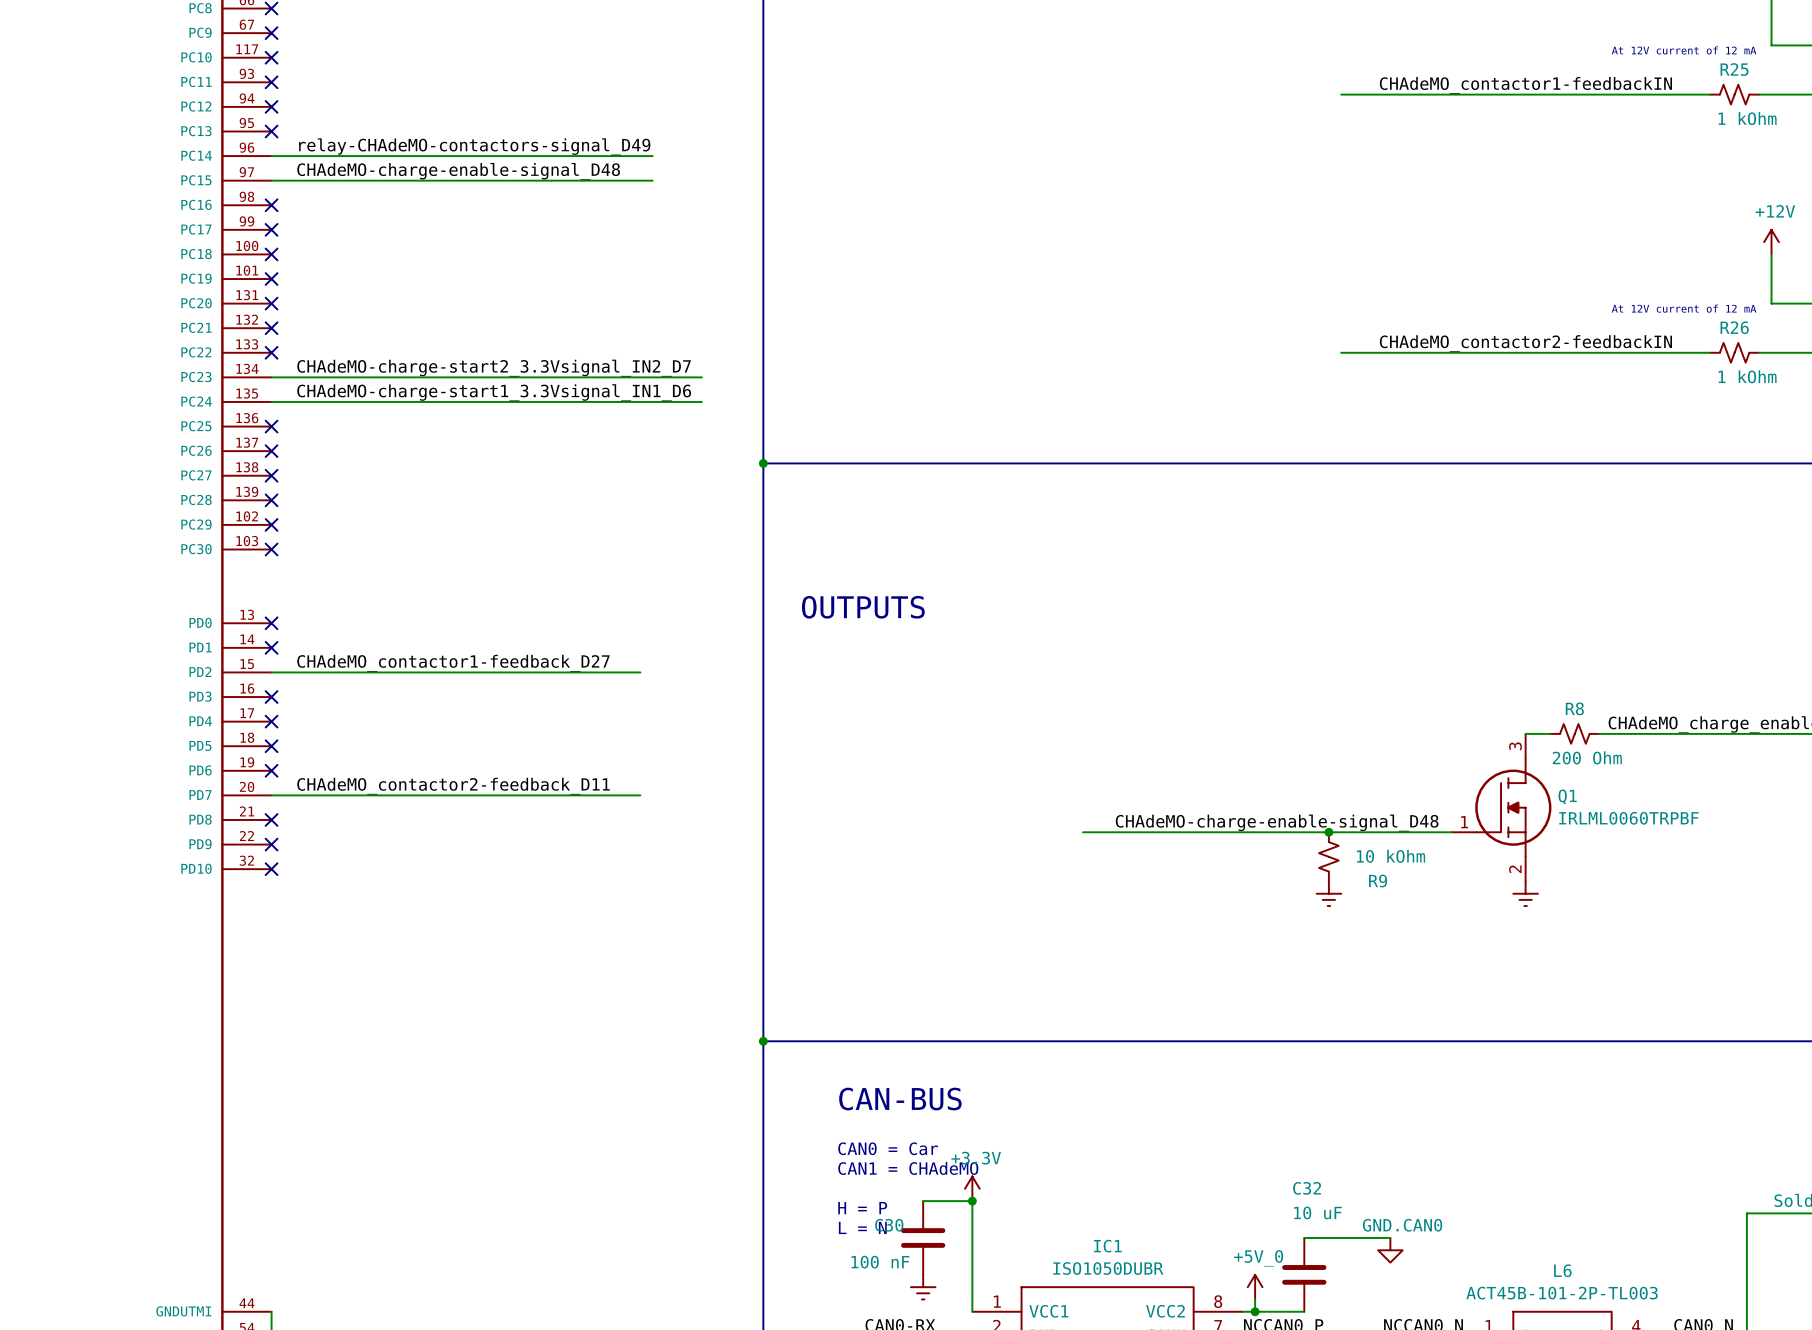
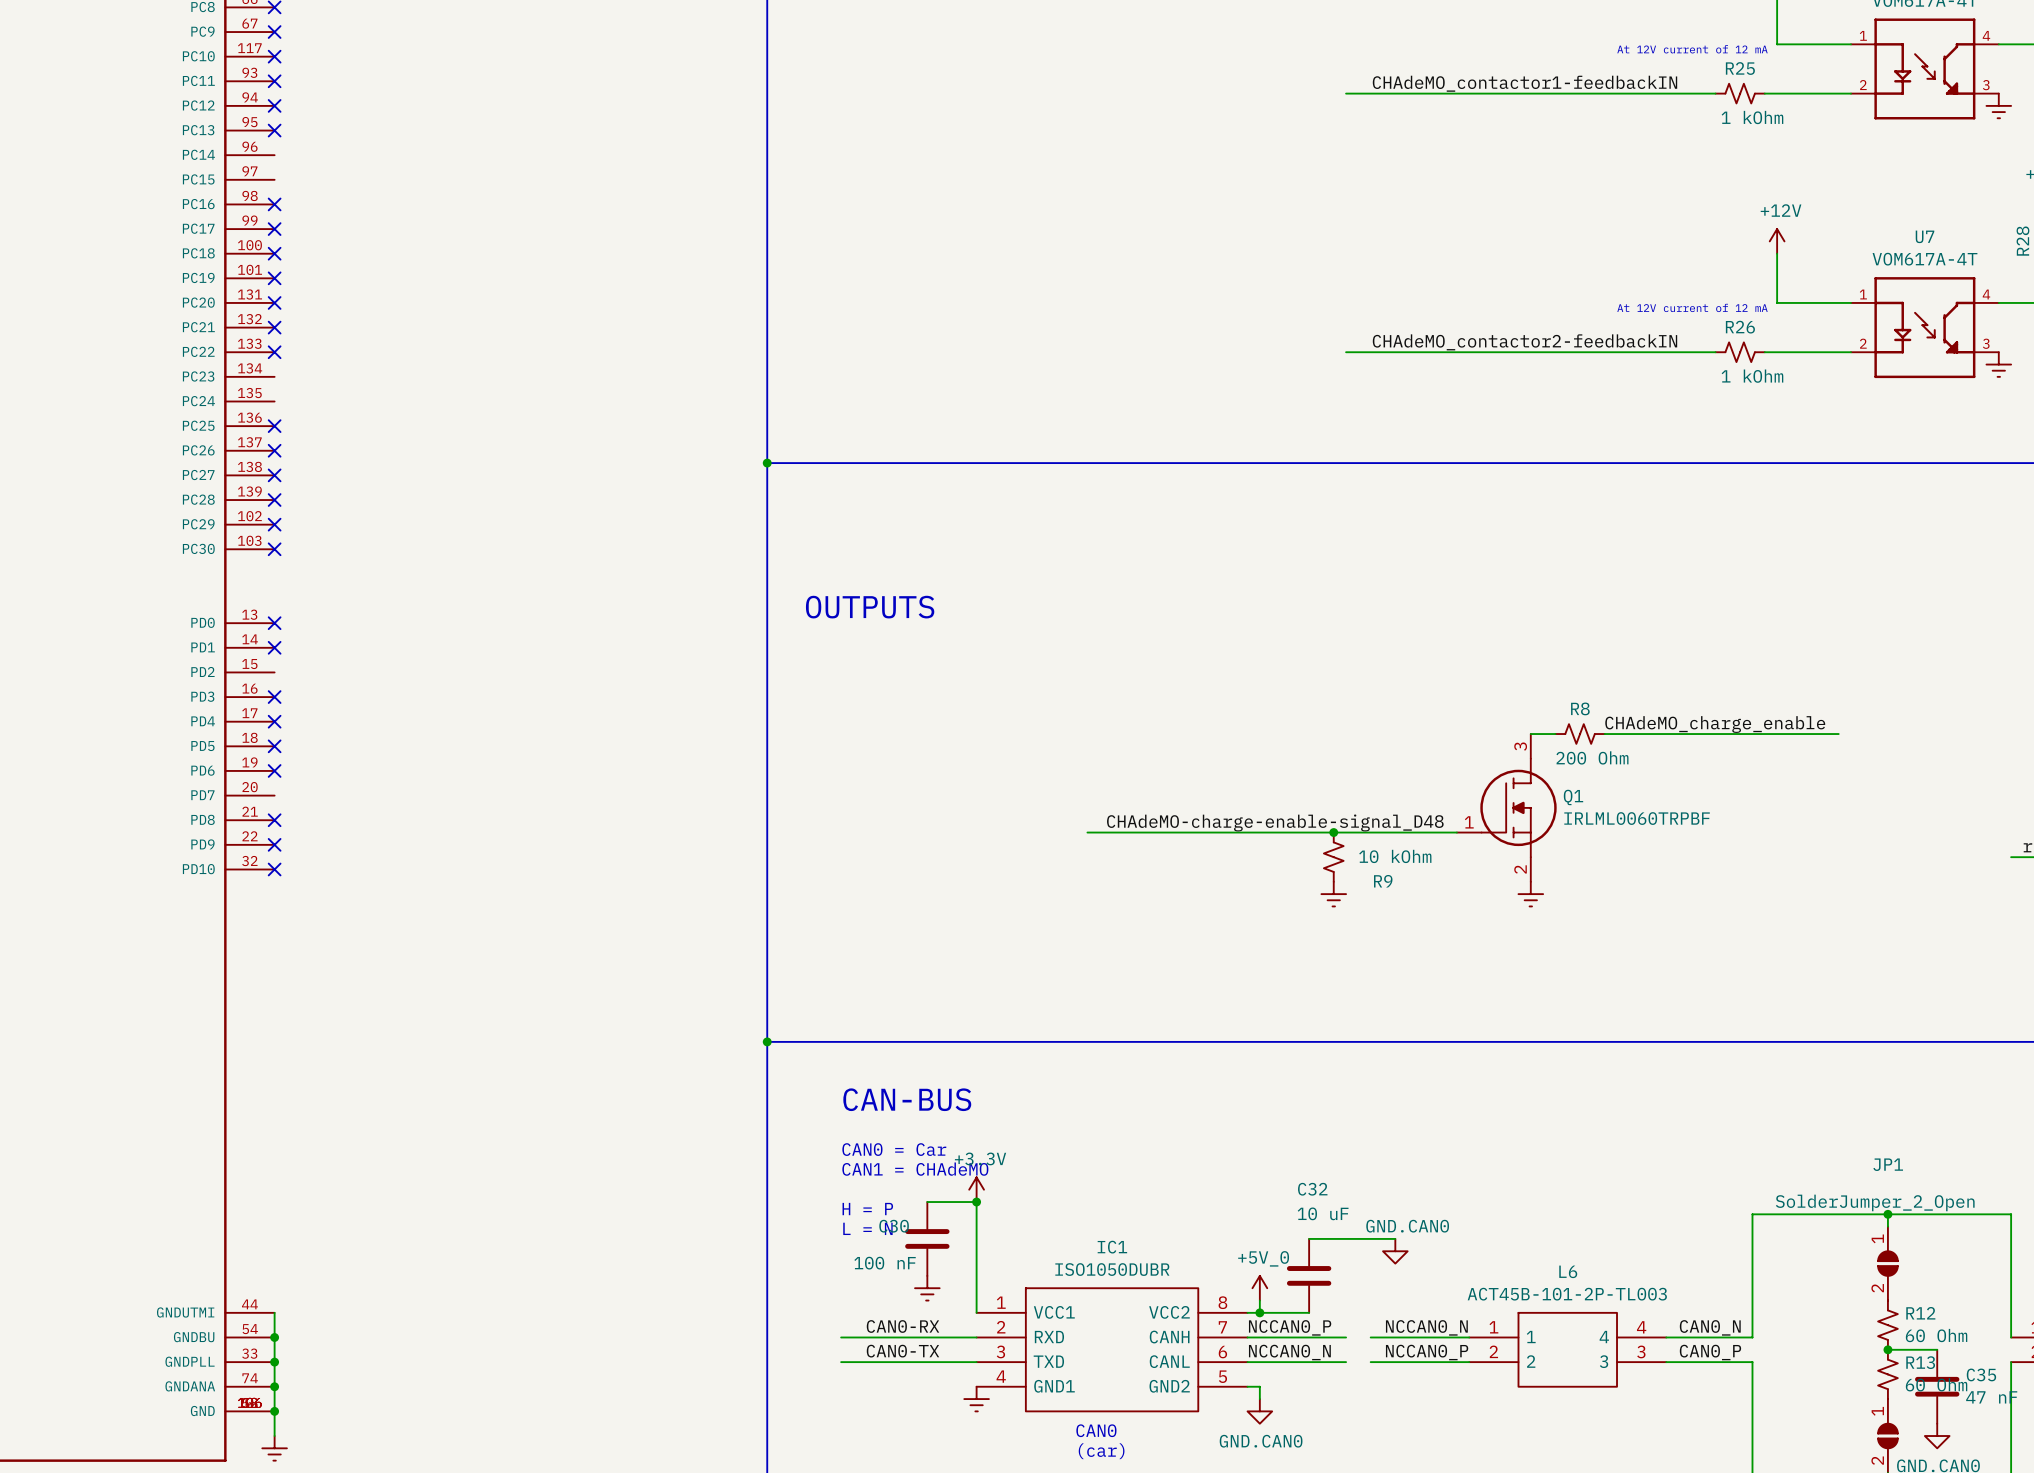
label: relay-CHAdeMO-contactors-signal_D49 (474, 146) -> none
wire: (271, 156) (652, 156) -> none
label: CHAdeMO-charge-enable-signal_D48 (458, 171) -> none
wire: (271, 180) (652, 180) -> none
label: CHAdeMO-charge-start2_3.3Vsignal_IN2_D7 (494, 368) -> none
wire: (271, 377) (701, 377) -> none
label: CHAdeMO-charge-start1_3.3Vsignal_IN1_D6 (494, 392) -> none
wire: (271, 401) (701, 401) -> none
label: CHAdeMO_contactor1-feedback_D27 (453, 663) -> none
wire: (271, 672) (640, 672) -> none
label: CHAdeMO_contactor2-feedback_D11 (453, 786) -> none
wire: (271, 795) (640, 795) -> none

